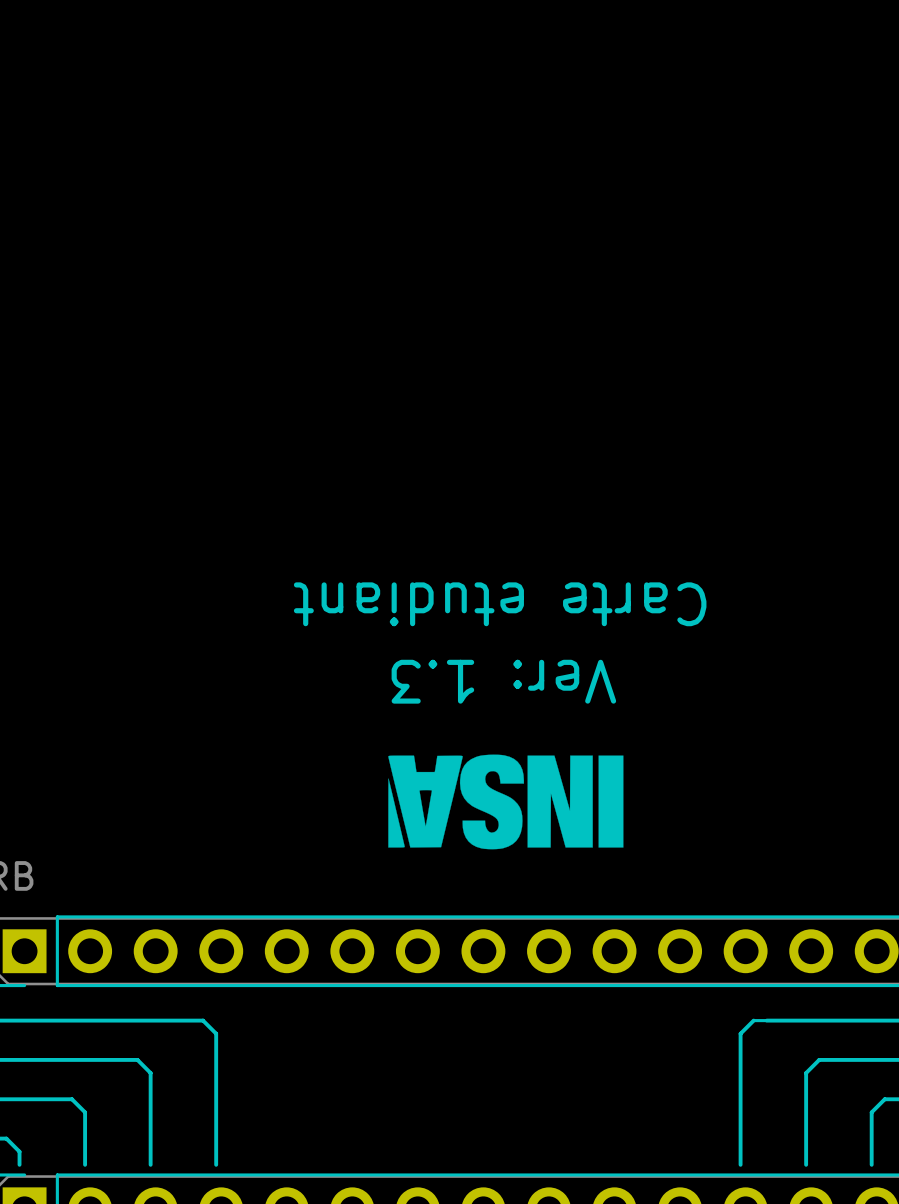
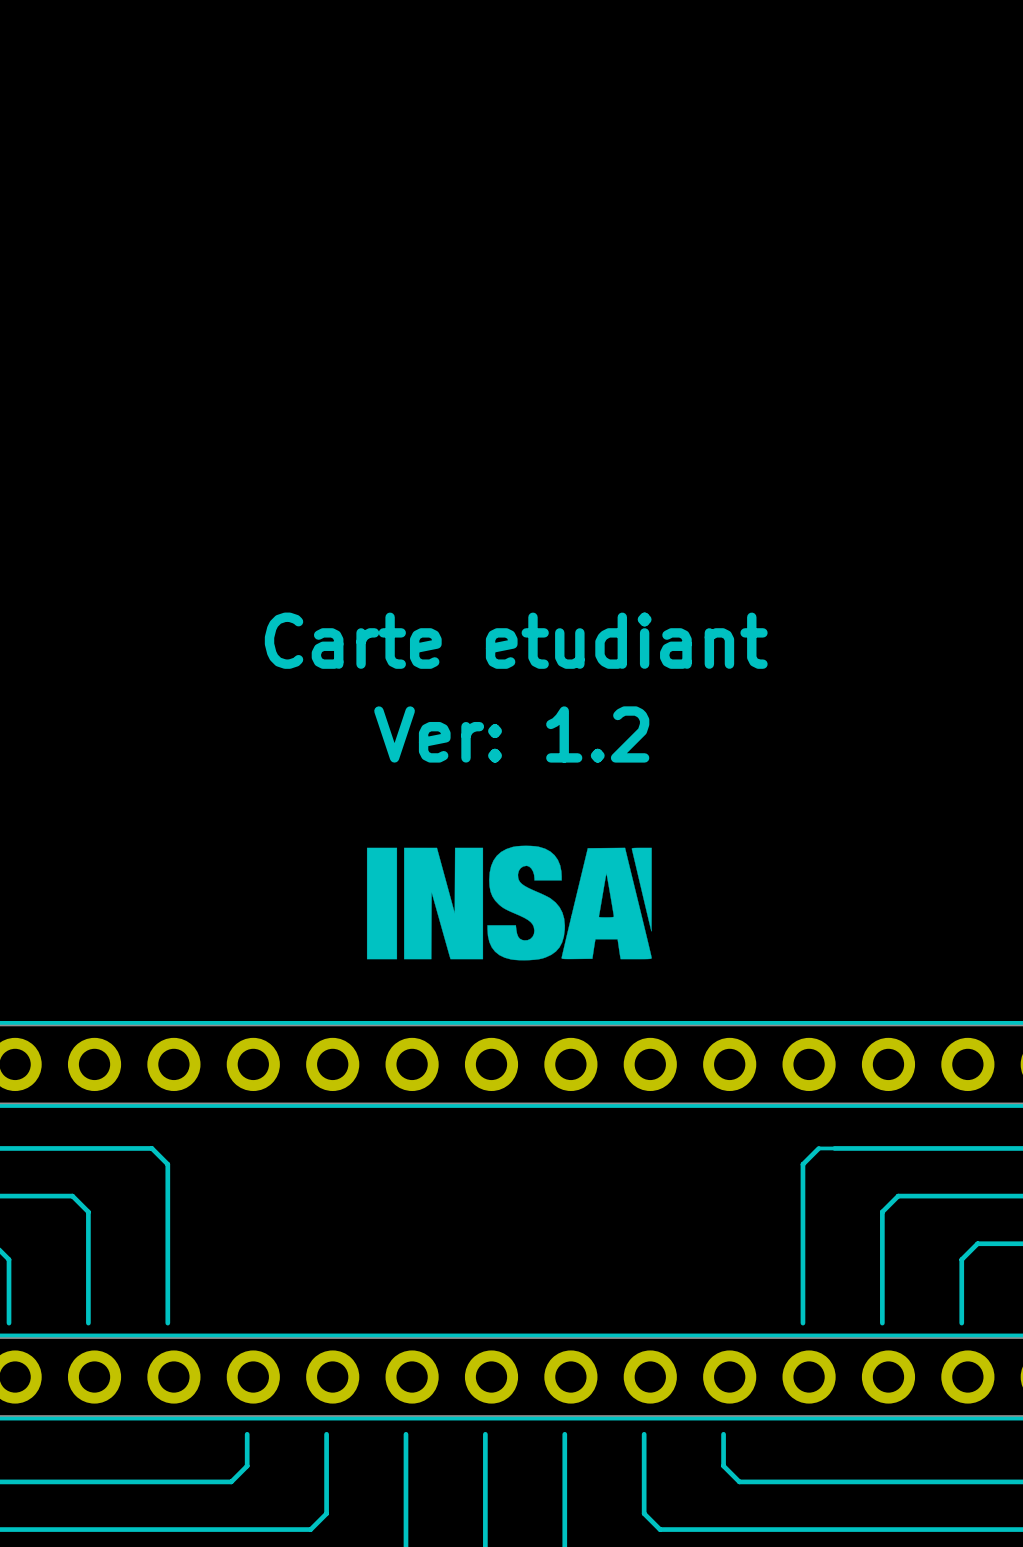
text rotation: 0° (500, 604) -> 180° (516, 640)
text: Ver: 1.3 (503, 681) -> Ver: 1.2 (511, 734)
drawing shape: [388, 754, 624, 850] -> [366, 845, 652, 961]

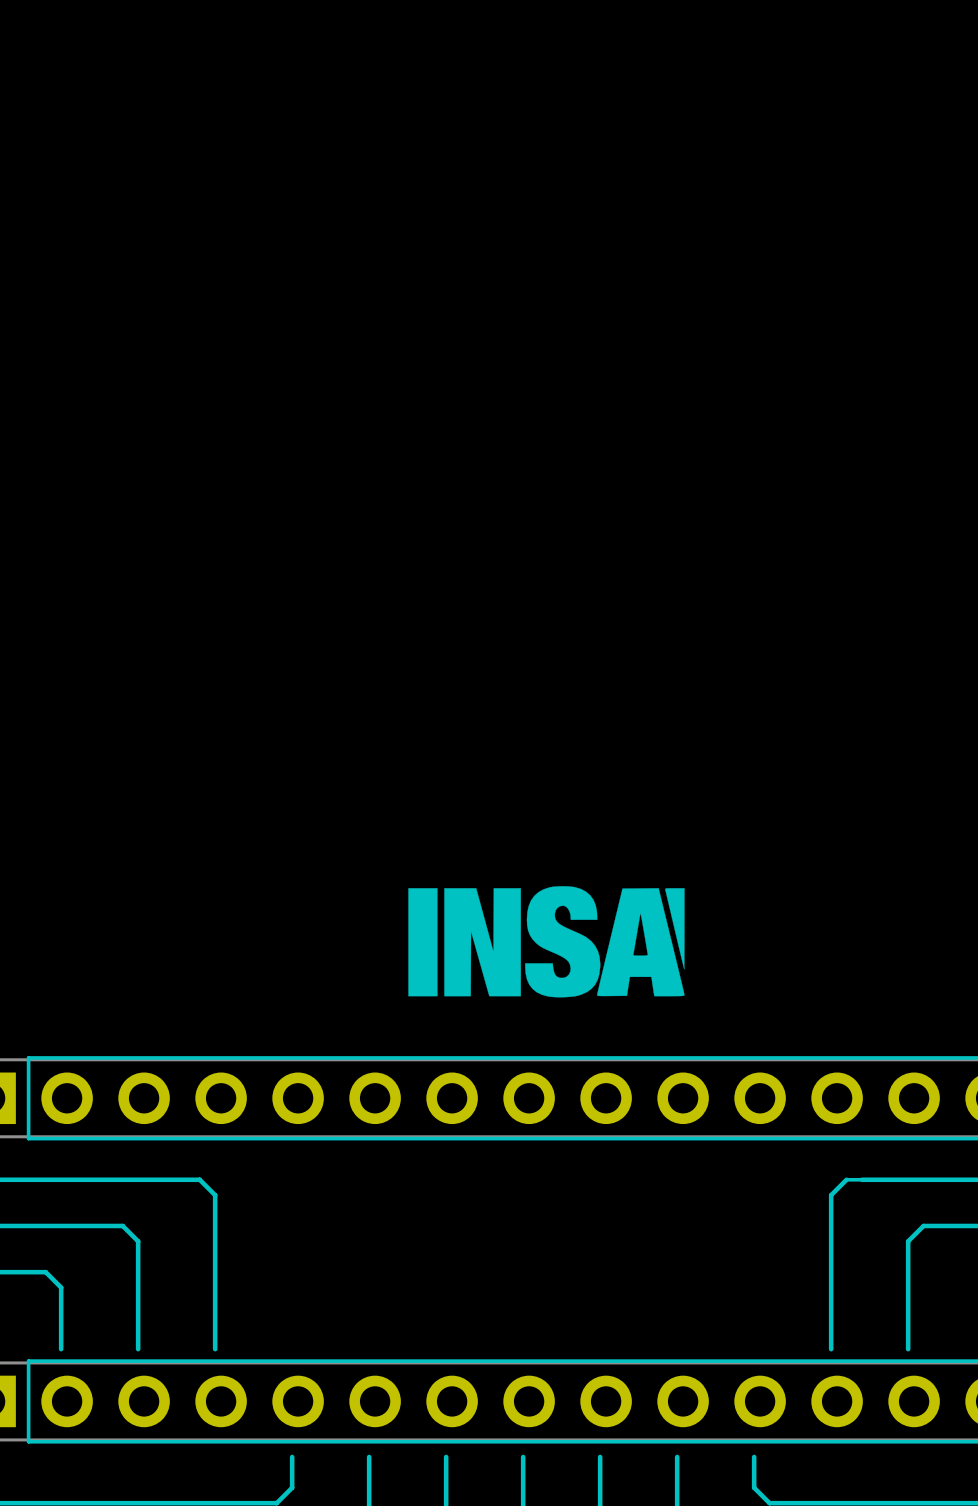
text: Carte etudiant (516, 640) -> none
text: Ver: 1.2 (511, 734) -> none

